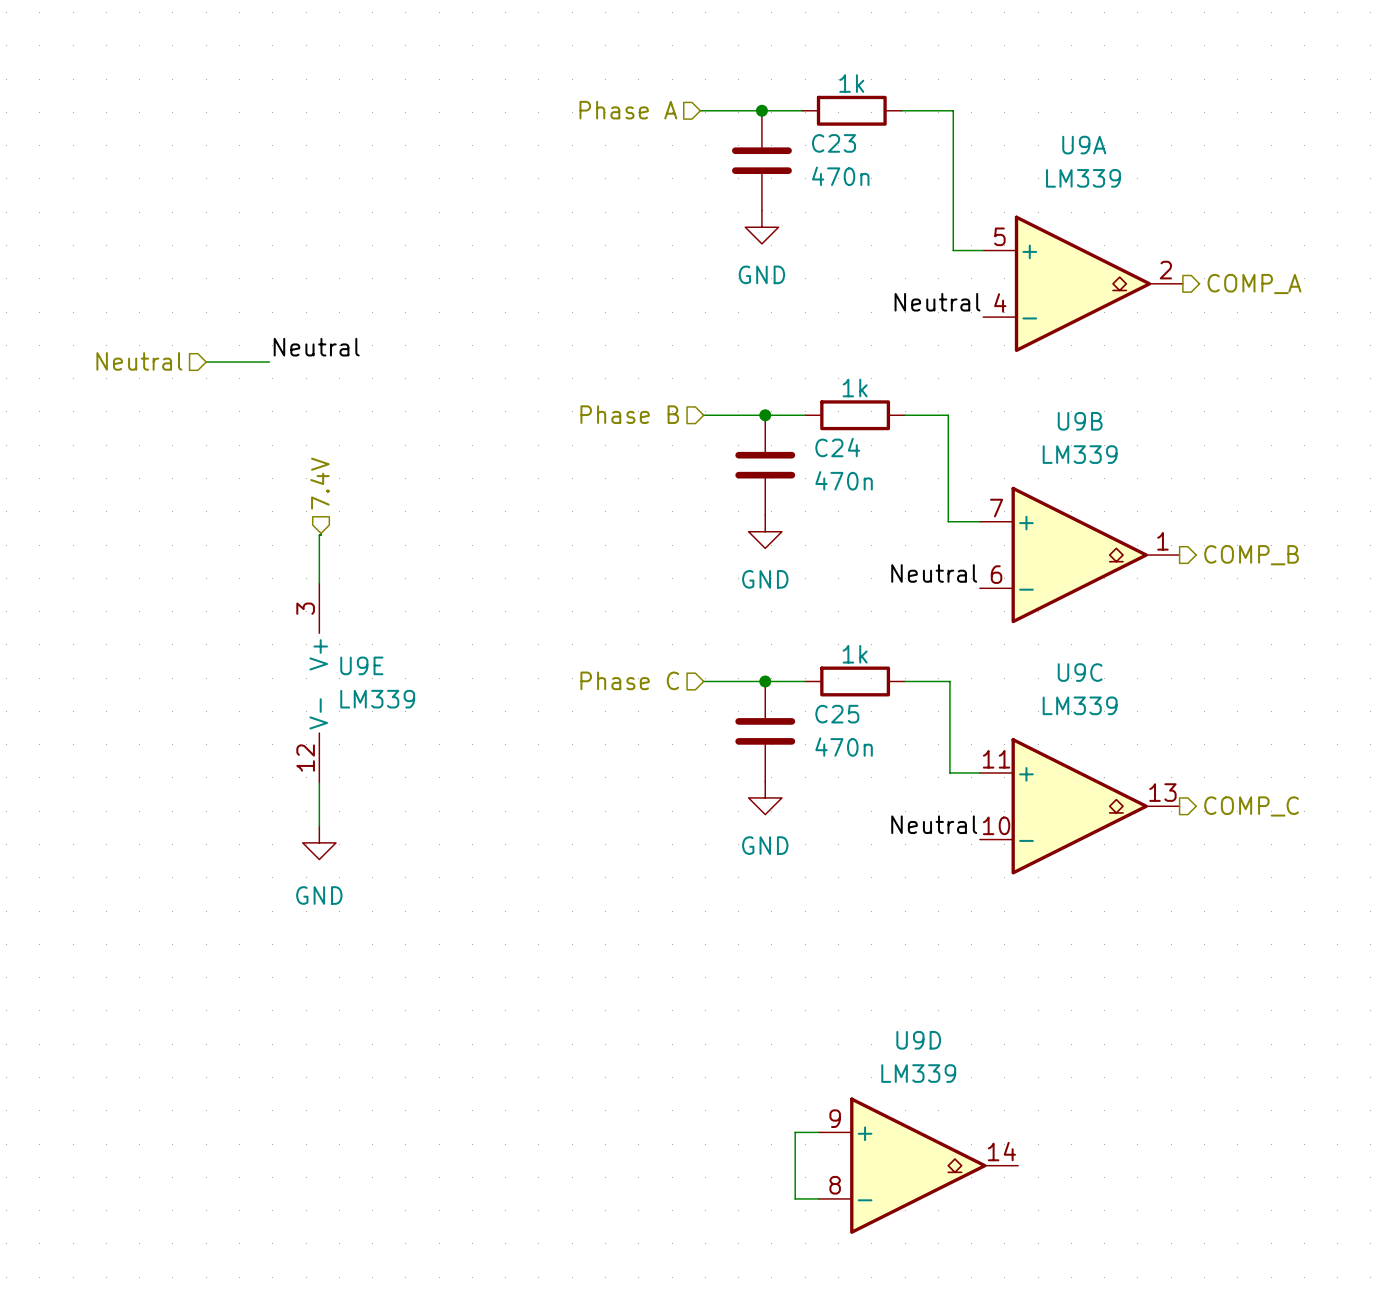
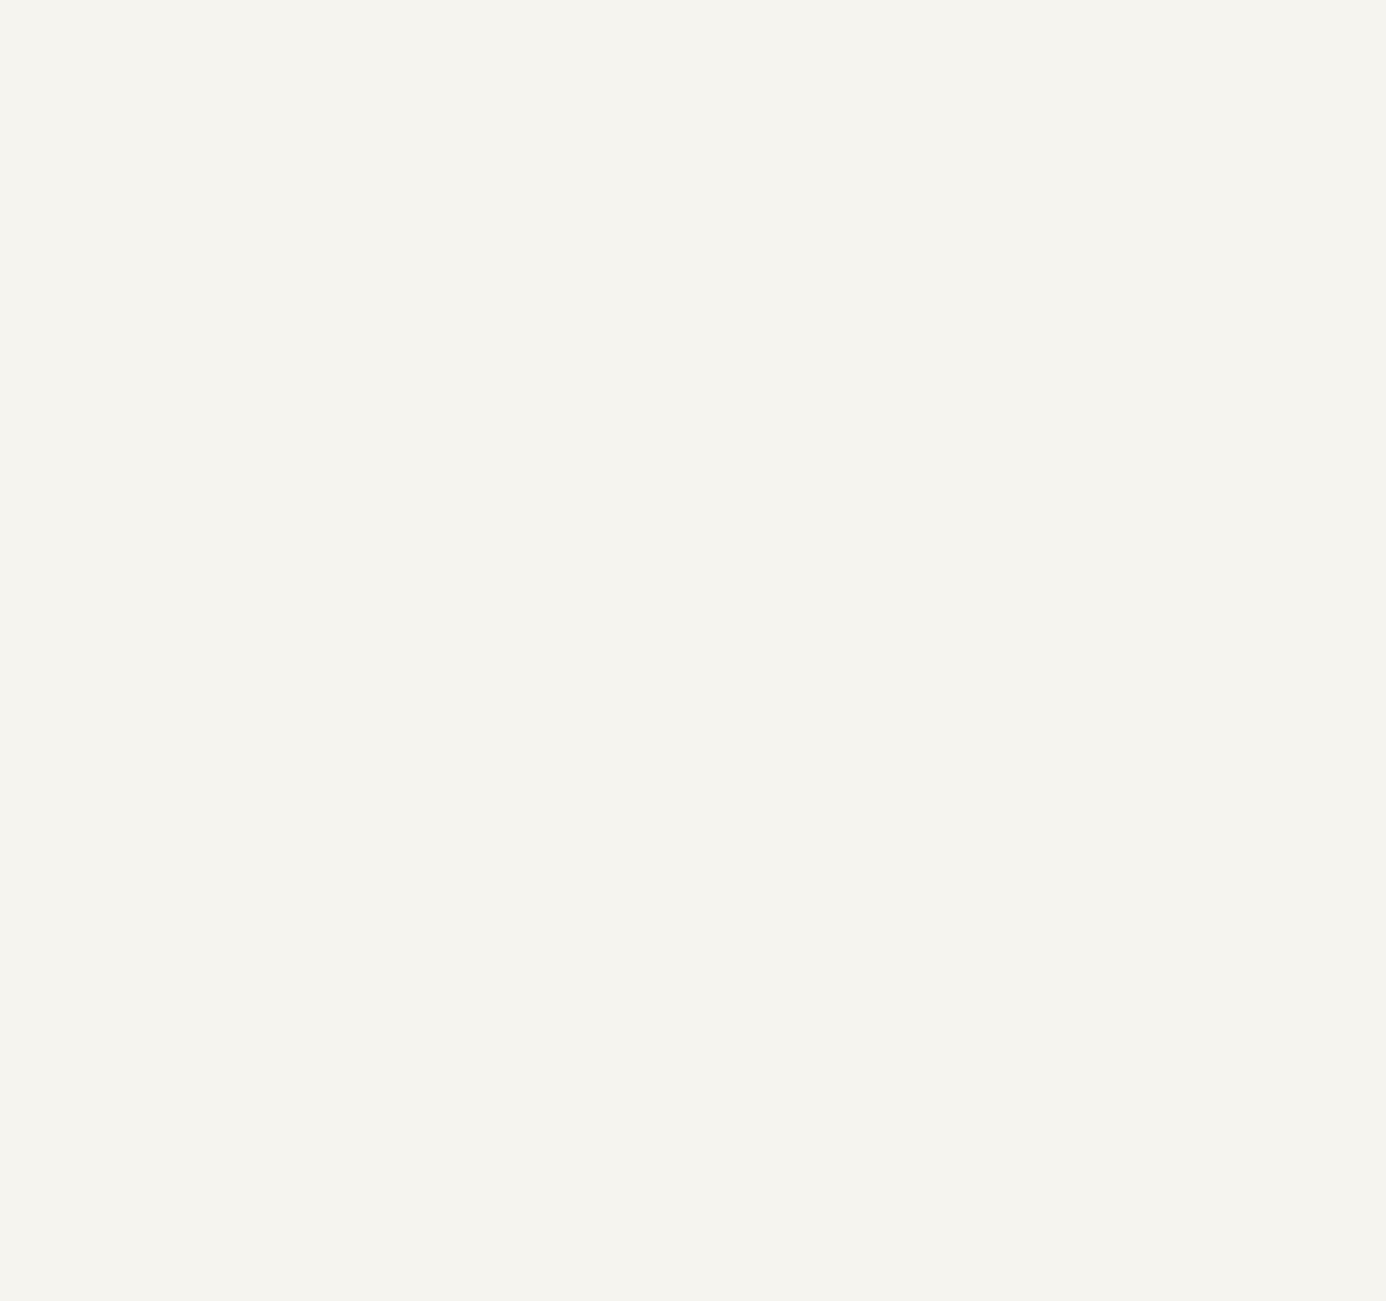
hierarchical label: Phase A (628, 110) -> none
wire: (700, 110) (801, 110) -> none
junction: (761, 110) -> none
part: 1k (851, 110) -> none
wire: (901, 110) (953, 110) (953, 250) (983, 250) -> none
C23: 470n (761, 160) -> none
power symbol: GND (761, 227) -> none
U9A: LM339 (1083, 283) -> none
hierarchical label: COMP_A (1254, 283) -> none
label: Neutral (937, 302) -> none
label: Neutral (316, 347) -> none
hierarchical label: Neutral (139, 361) -> none
wire: (206, 362) (269, 362) -> none
hierarchical label: Phase B (629, 414) -> none
wire: (703, 415) (805, 415) -> none
junction: (765, 415) -> none
part: 1k (855, 415) -> none
wire: (905, 415) (948, 415) (948, 521) (979, 521) -> none
C24: 470n (765, 465) -> none
hierarchical label: 7.4V (319, 483) -> none
power symbol: GND (765, 531) -> none
wire: (321, 533) (319, 535) (319, 583) -> none
U9B: LM339 (1079, 555) -> none
hierarchical label: COMP_B (1251, 555) -> none
label: Neutral (934, 573) -> none
hierarchical label: Phase C (629, 680) -> none
wire: (703, 681) (805, 681) -> none
junction: (765, 681) -> none
part: 1k (855, 681) -> none
wire: (905, 681) (949, 681) (949, 773) (979, 773) -> none
U9E: LM339 (319, 683) -> none
C25: 470n (765, 731) -> none
wire: (319, 782) (319, 826) -> none
power symbol: GND (765, 797) -> none
U9C: LM339 (1079, 806) -> none
hierarchical label: COMP_C (1251, 806) -> none
label: Neutral (934, 824) -> none
power symbol: GND (319, 842) -> none
wire: (818, 1132) (795, 1132) (795, 1198) (818, 1198) -> none
U9D: LM339 (918, 1165) -> none

